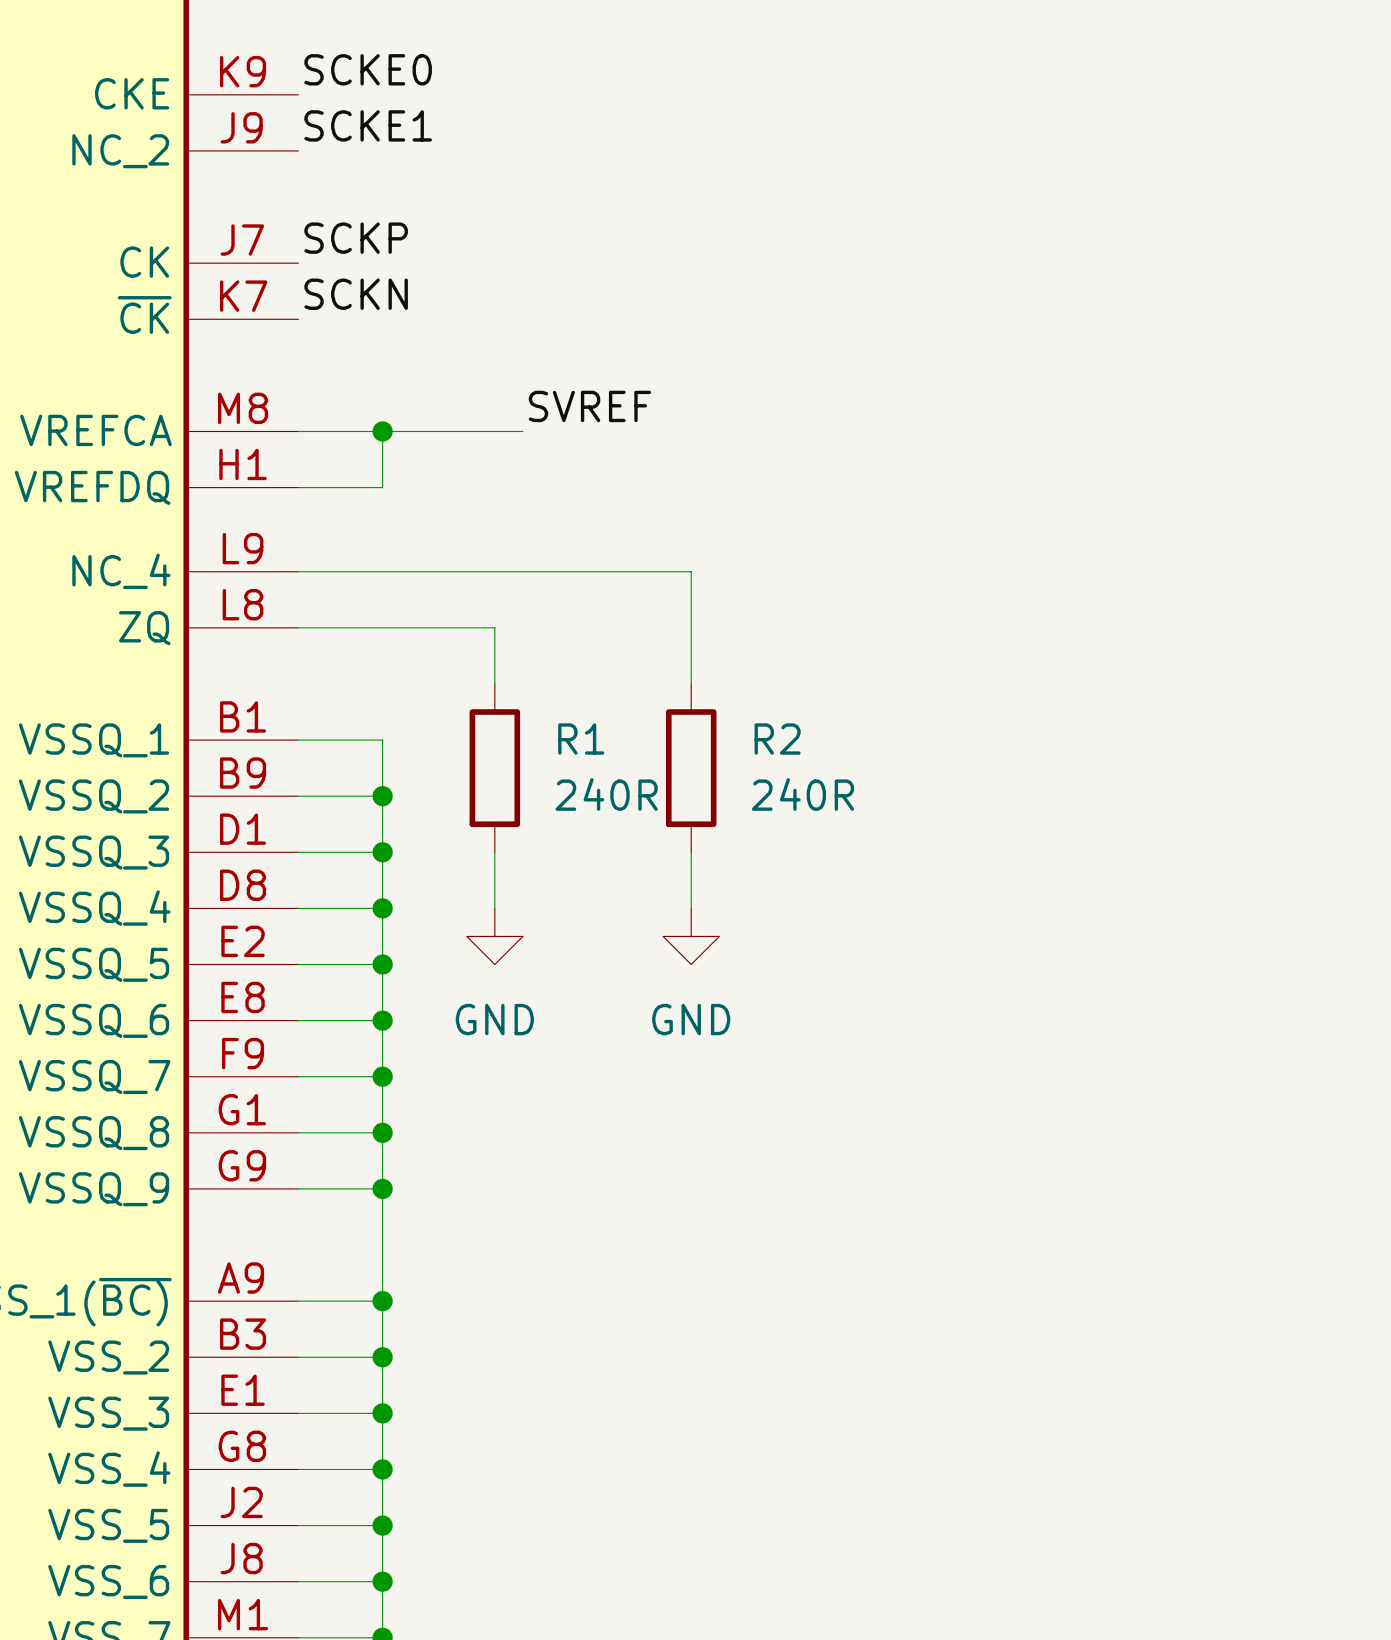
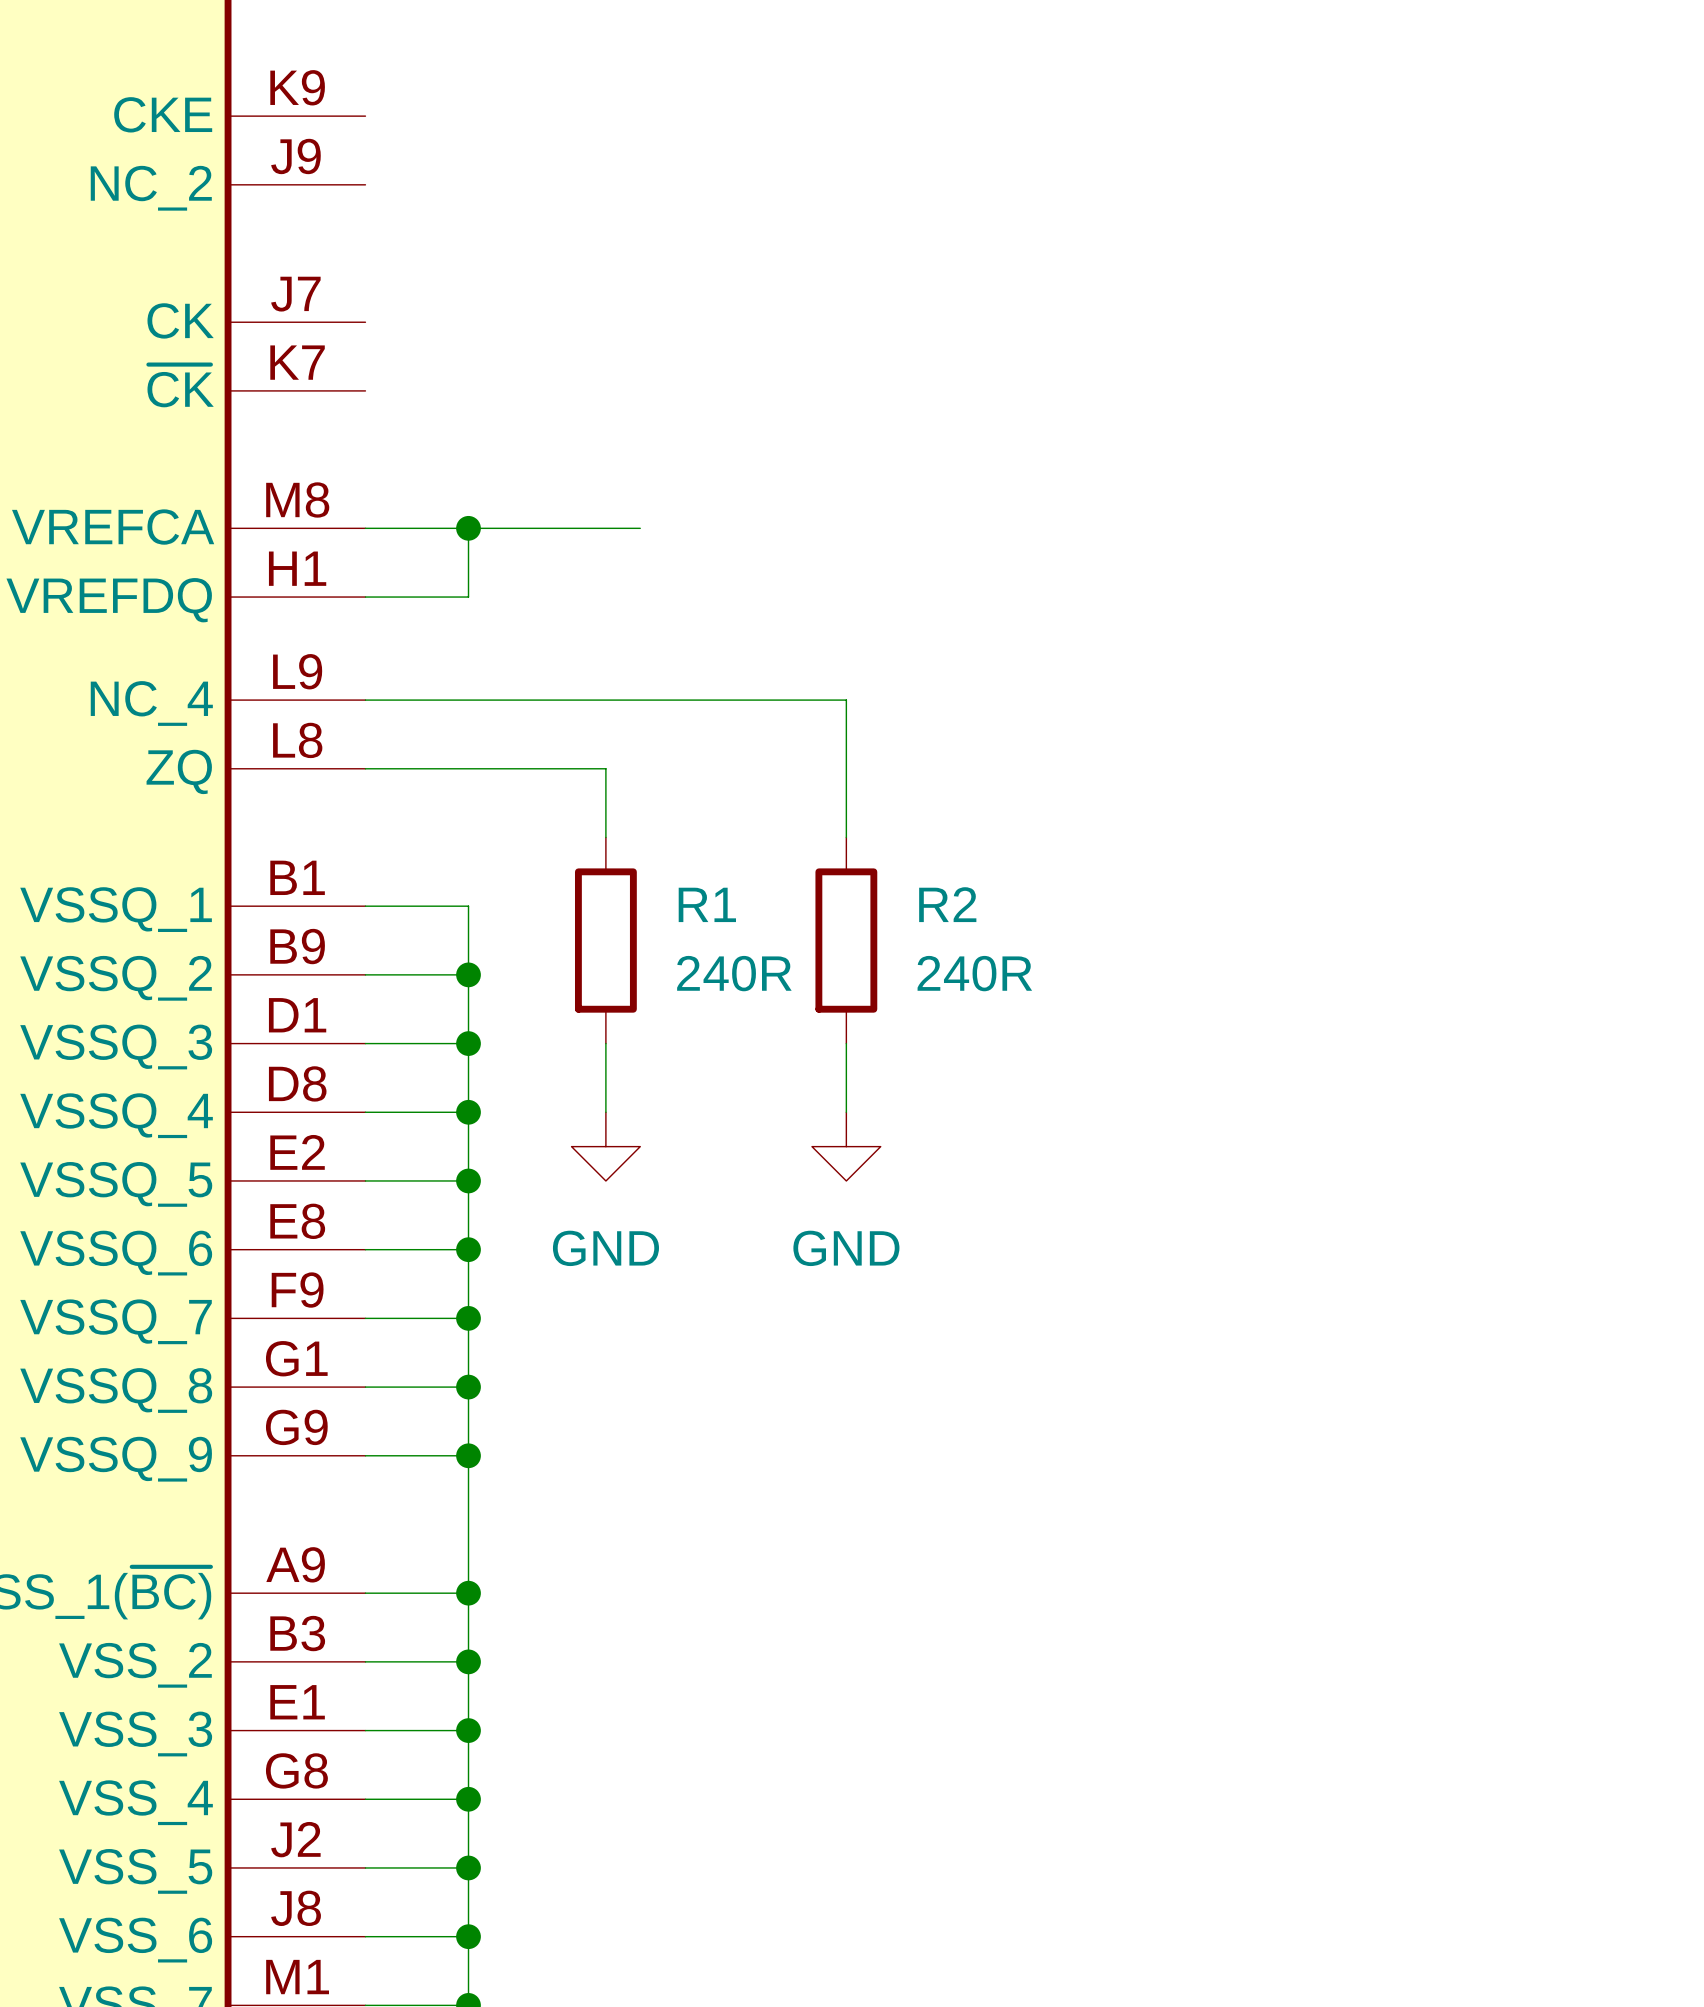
label: SCKE0 (368, 69) -> none
label: SCKE1 (368, 125) -> none
label: SCKP (356, 238) -> none
label: SCKN (356, 294) -> none
label: SVREF (589, 406) -> none

